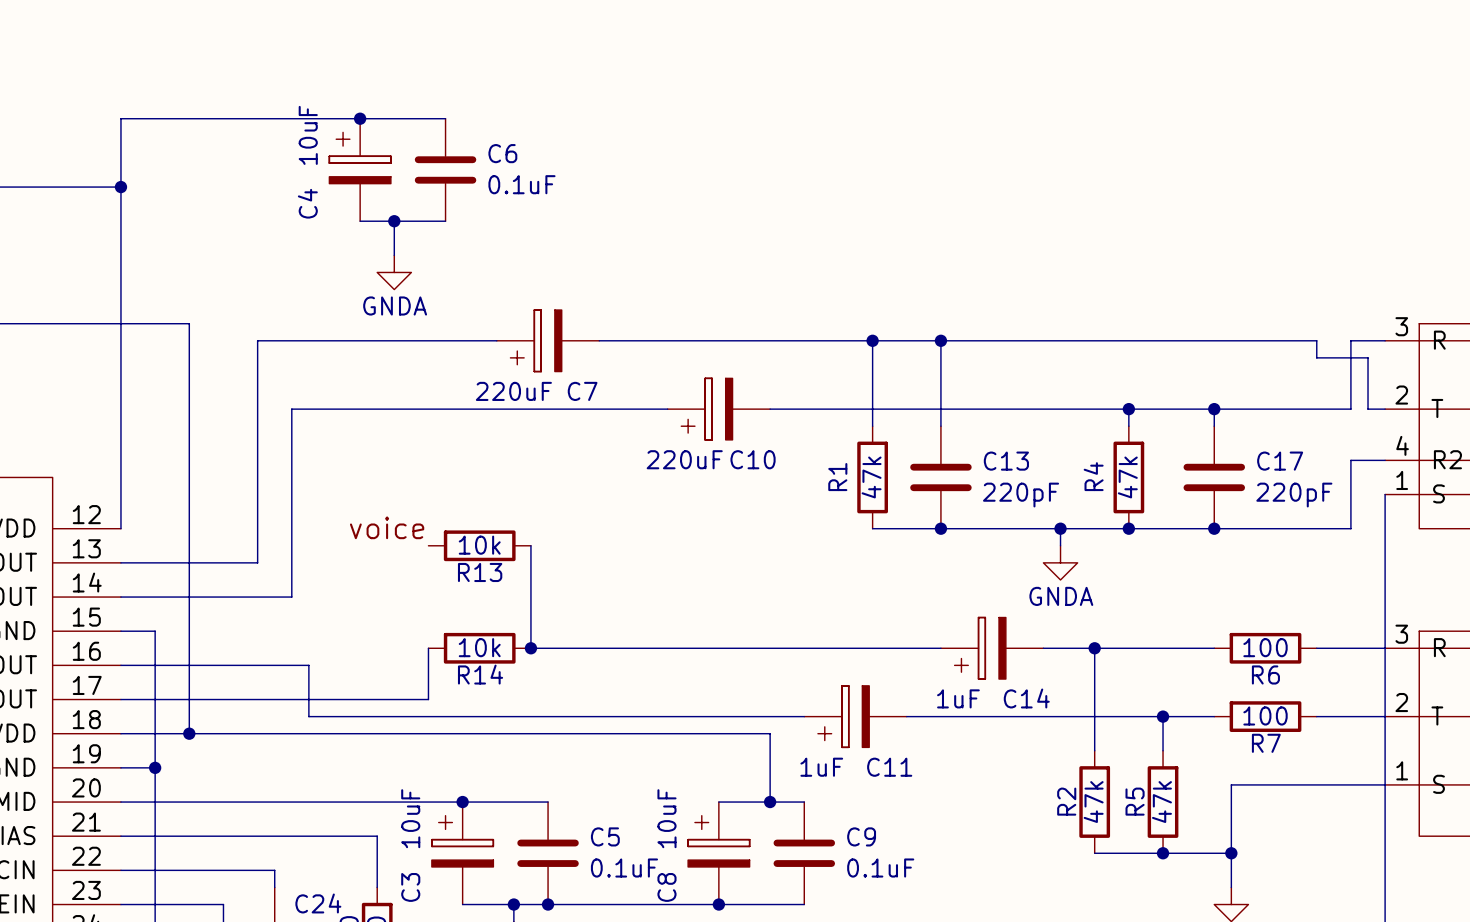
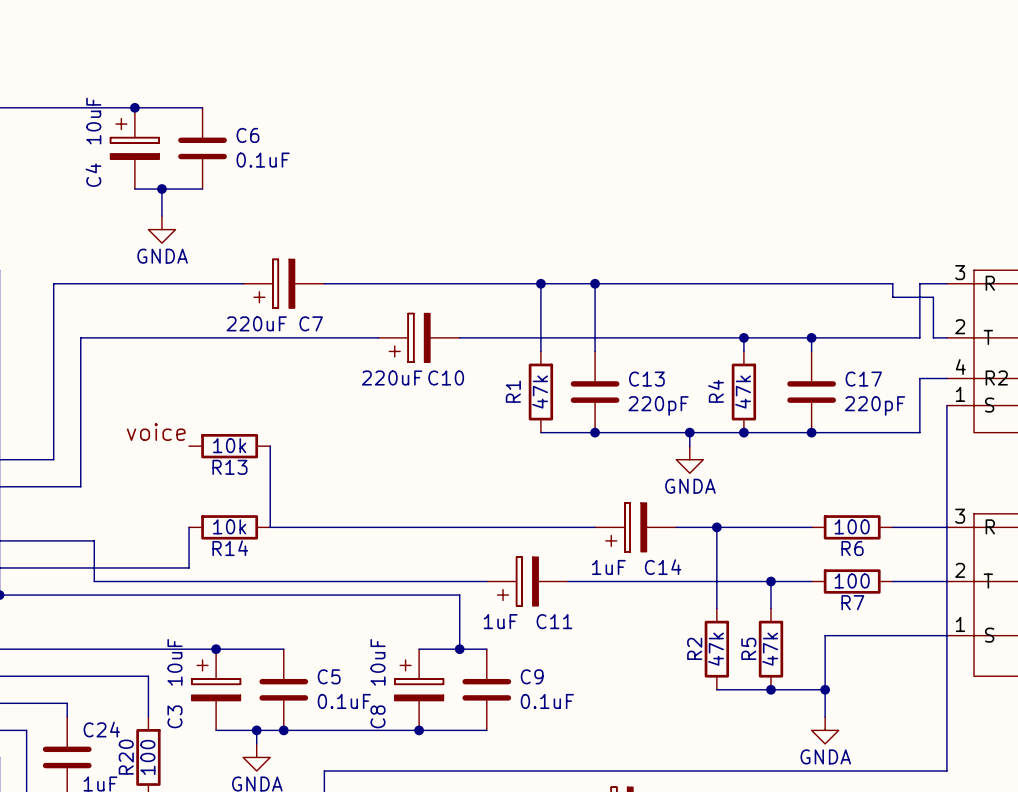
junction: (530, 648) -> none

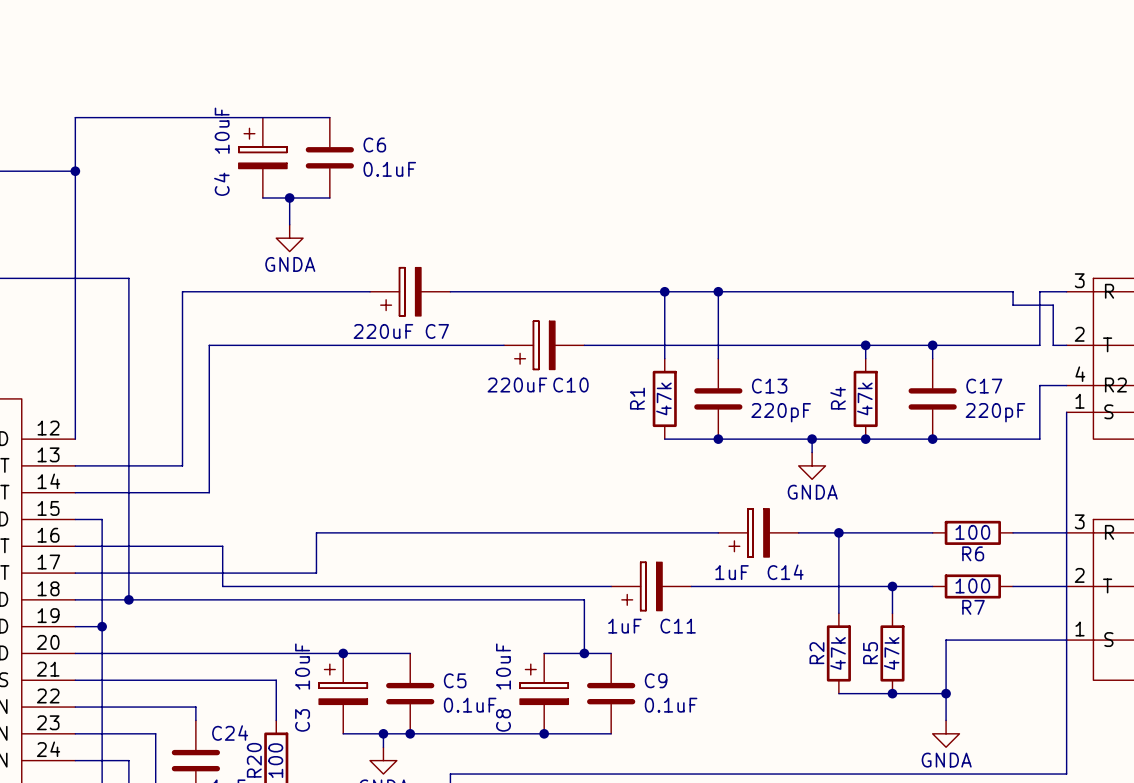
junction: (134, 107) -> none
label: voice (156, 432) -> none
R13: 10k (229, 446) -> none
wire: (270, 446) (270, 527) -> (316, 532) (396, 532)
R14: 10k (229, 527) -> none

